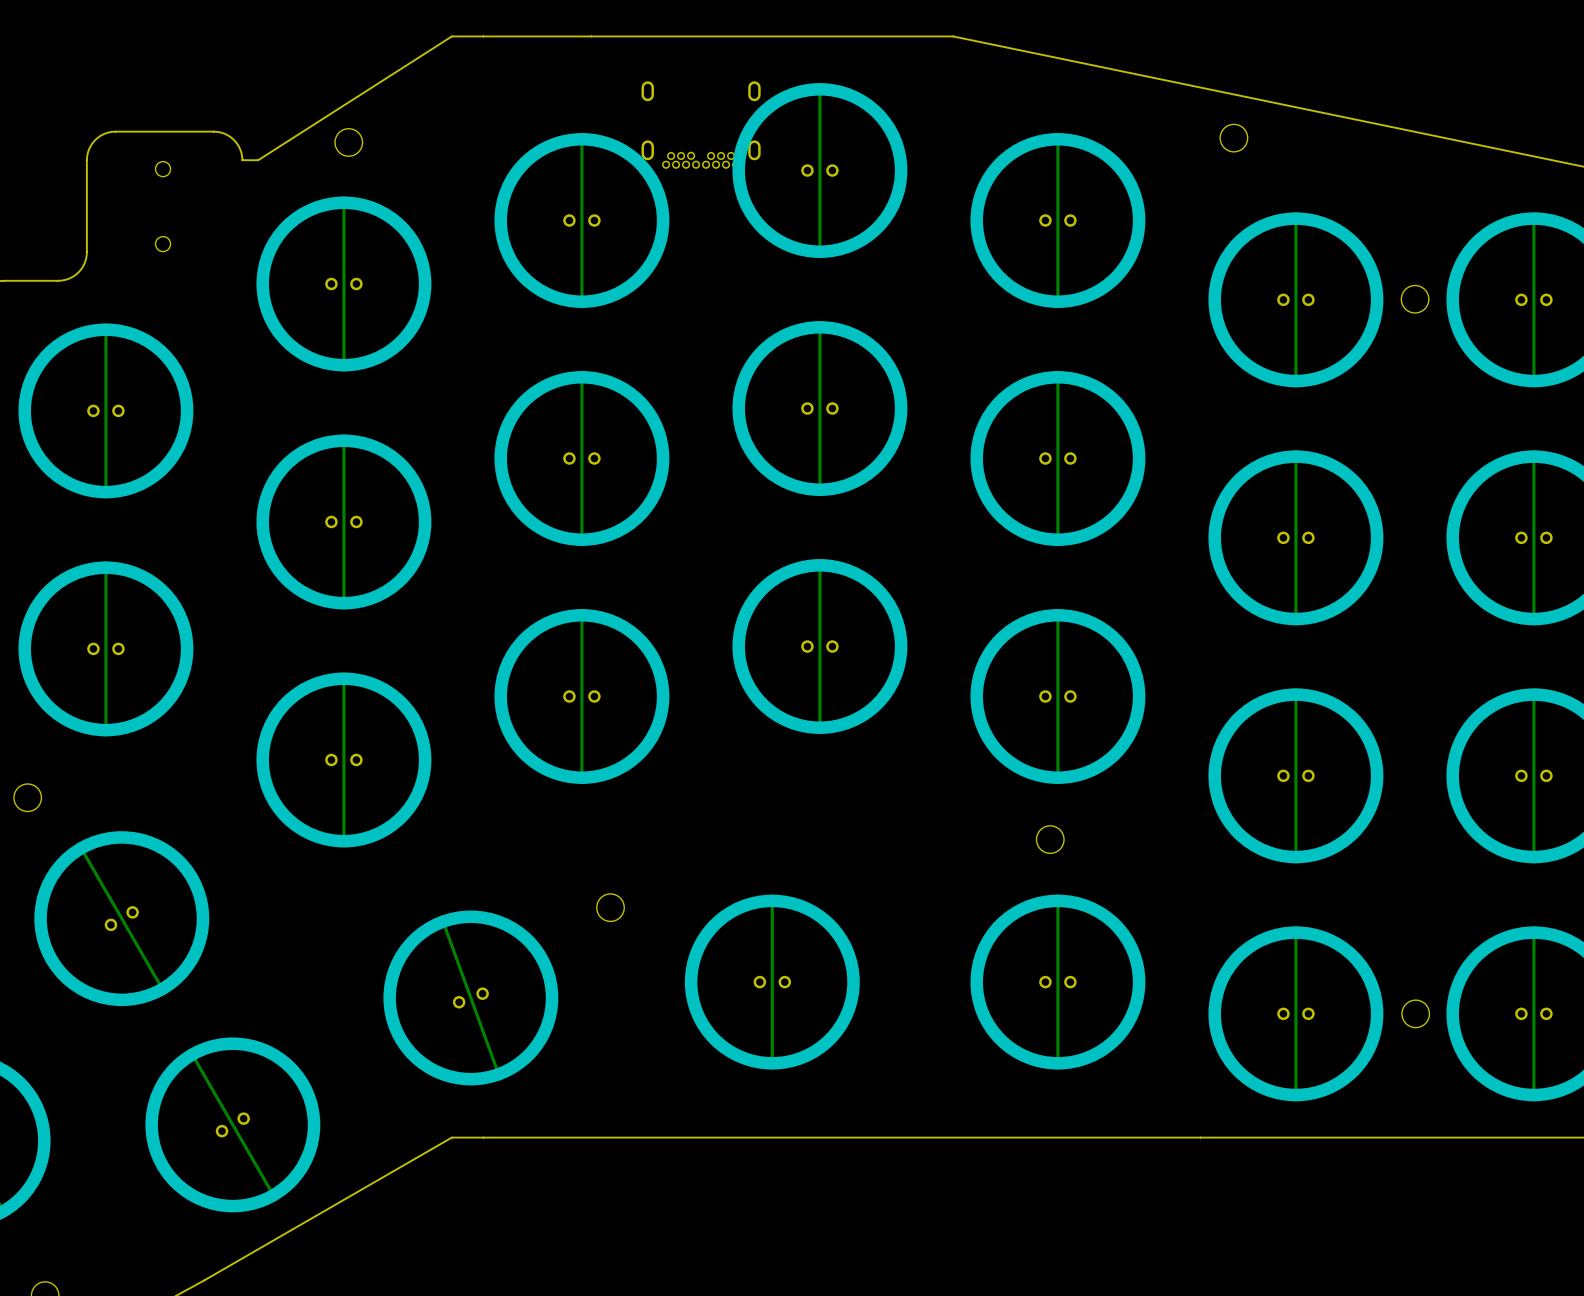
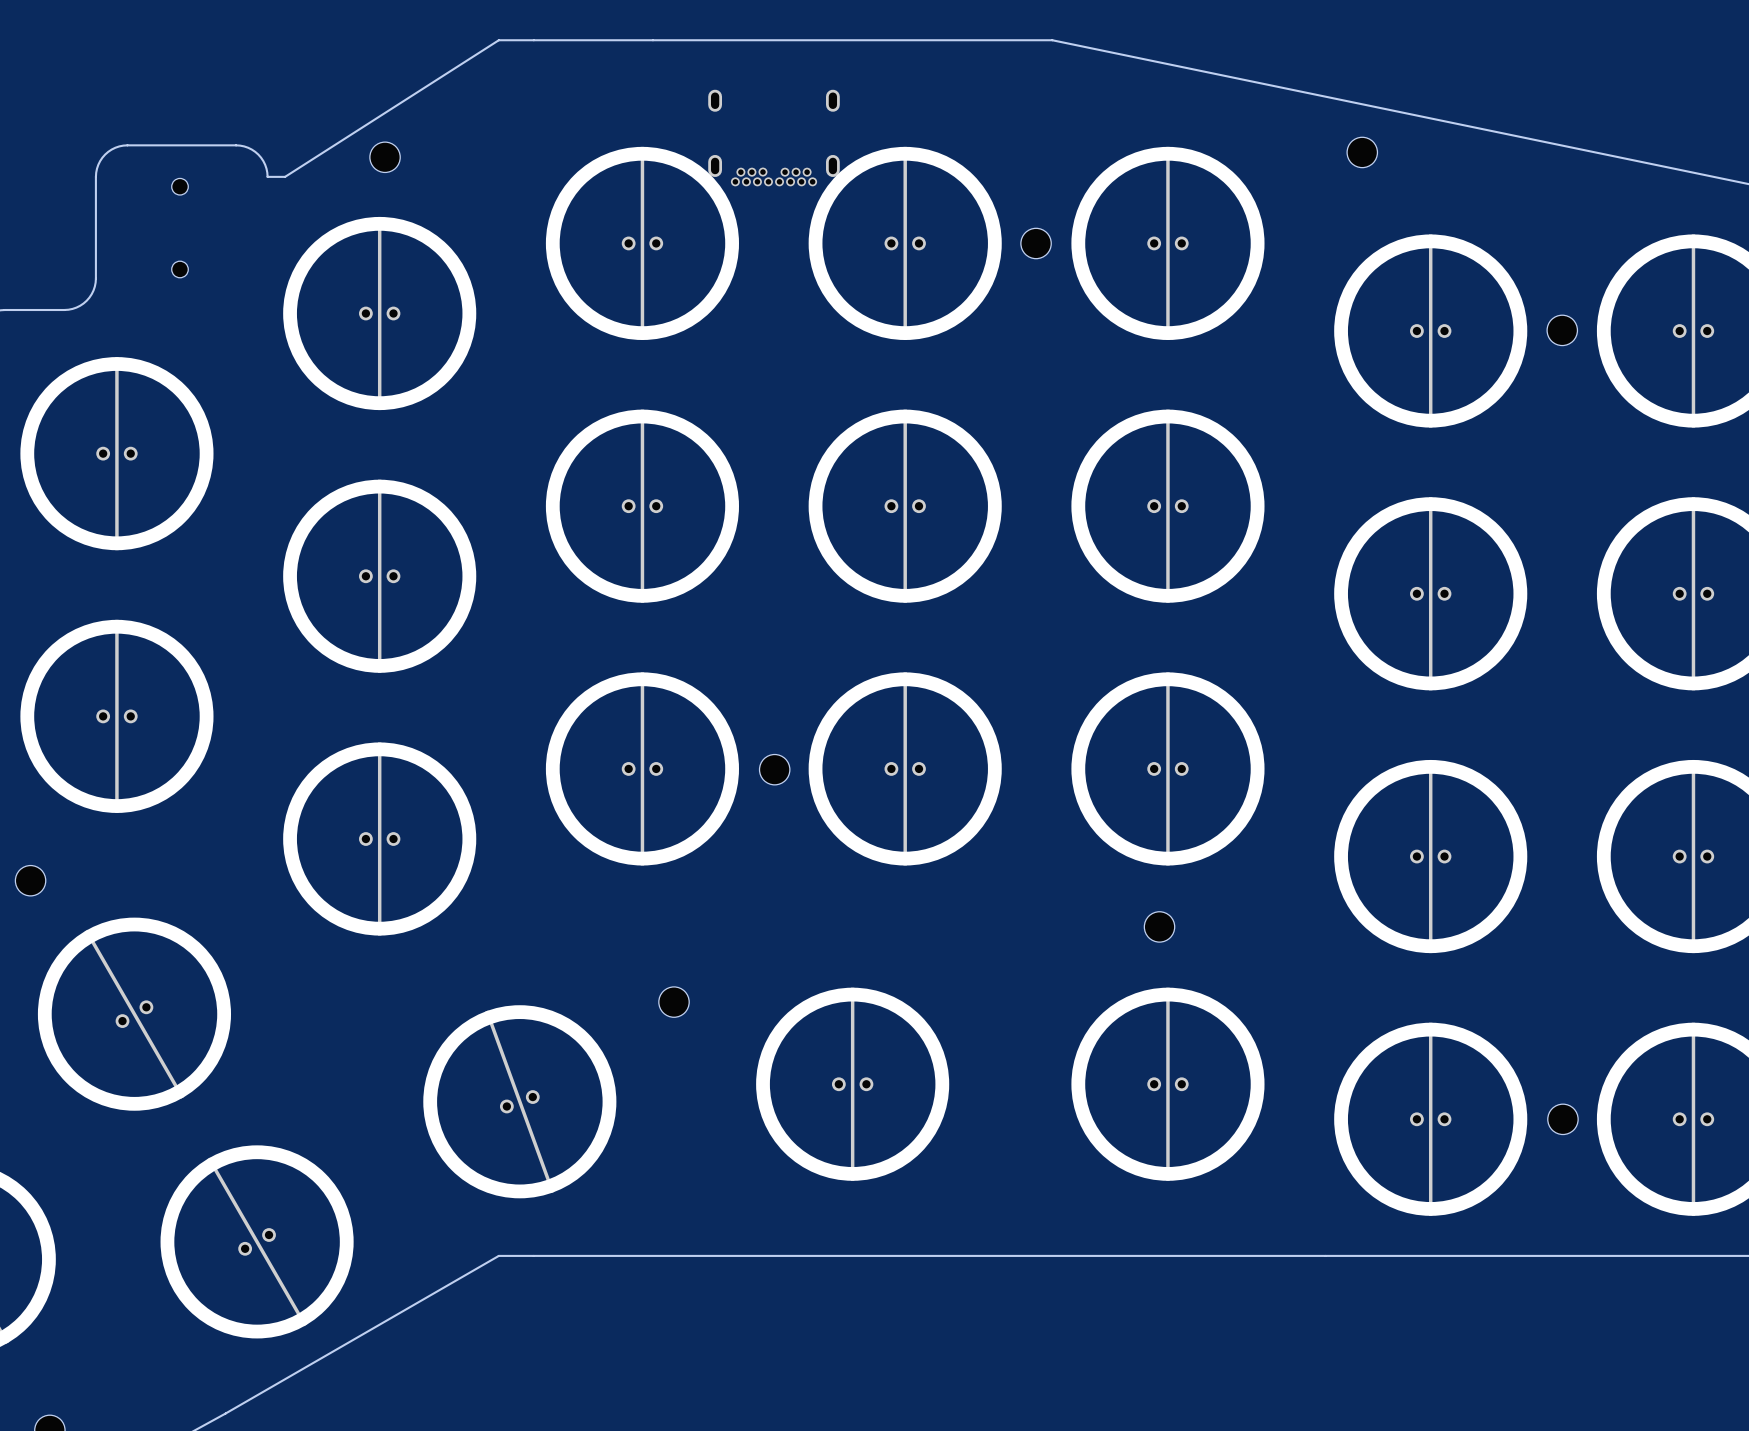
part position: (819, 170) -> (905, 243)
part: none -> (1036, 243)
part position: (819, 408) -> (905, 506)
part position: (819, 646) -> (905, 768)
part: none -> (774, 769)

